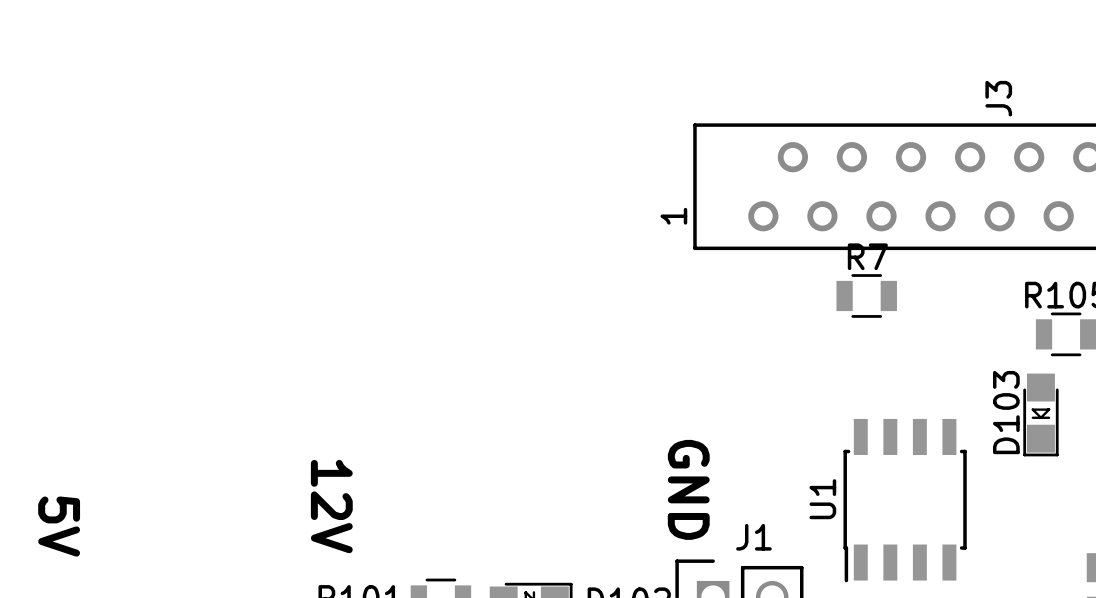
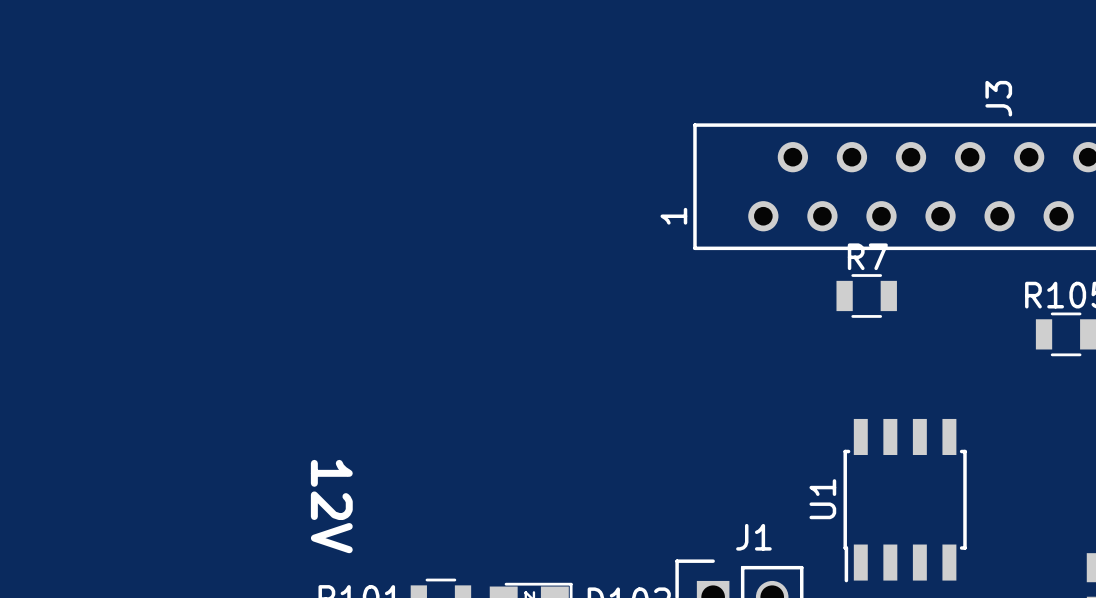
D103: (1040, 414) -> none
text: GND (688, 489) -> none
text: 5V (59, 526) -> none

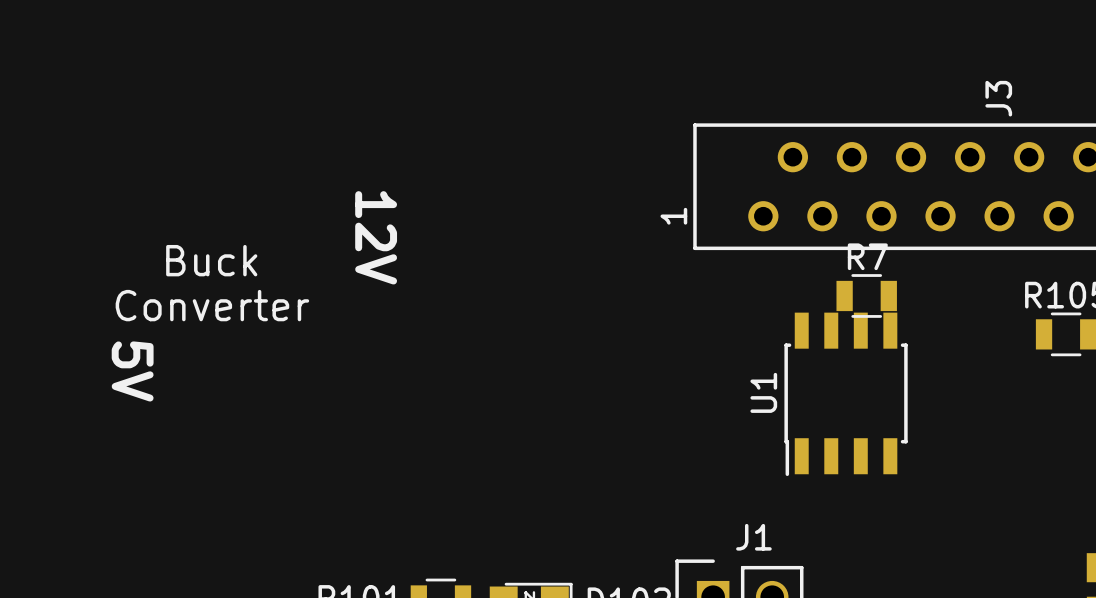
text: none -> Buck (211, 260)
text: none -> Converter (212, 305)
text: none -> 5V (132, 371)
U1 position: (905, 500) -> (846, 394)
text position: 12V (331, 506) -> 12V (376, 237)

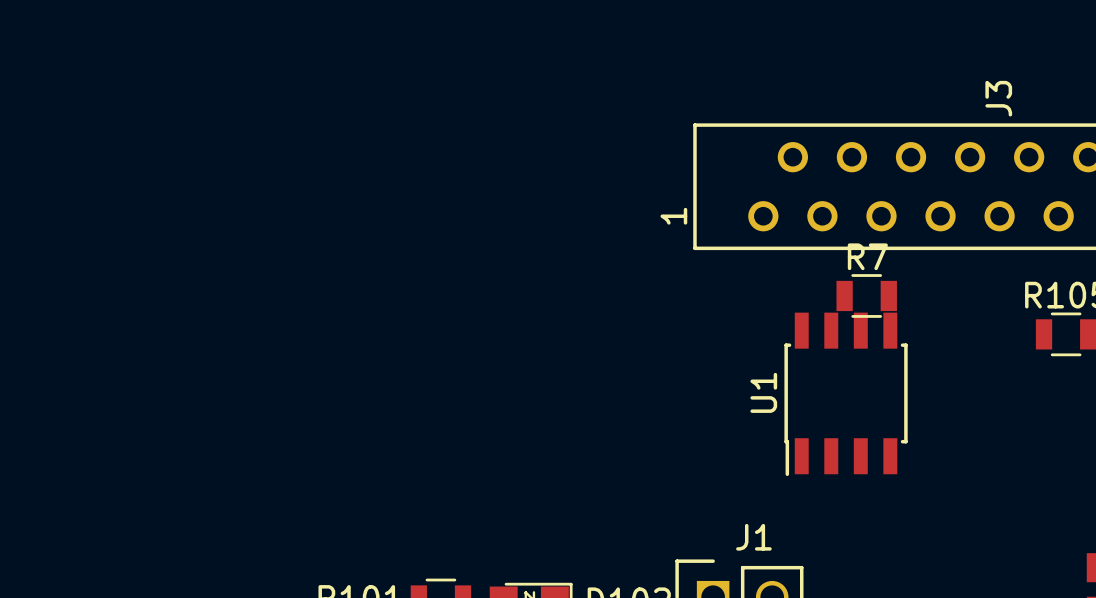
text: 12V (376, 237) -> none
text: Buck (211, 260) -> none
text: Converter (212, 305) -> none
text: 5V (132, 371) -> none

